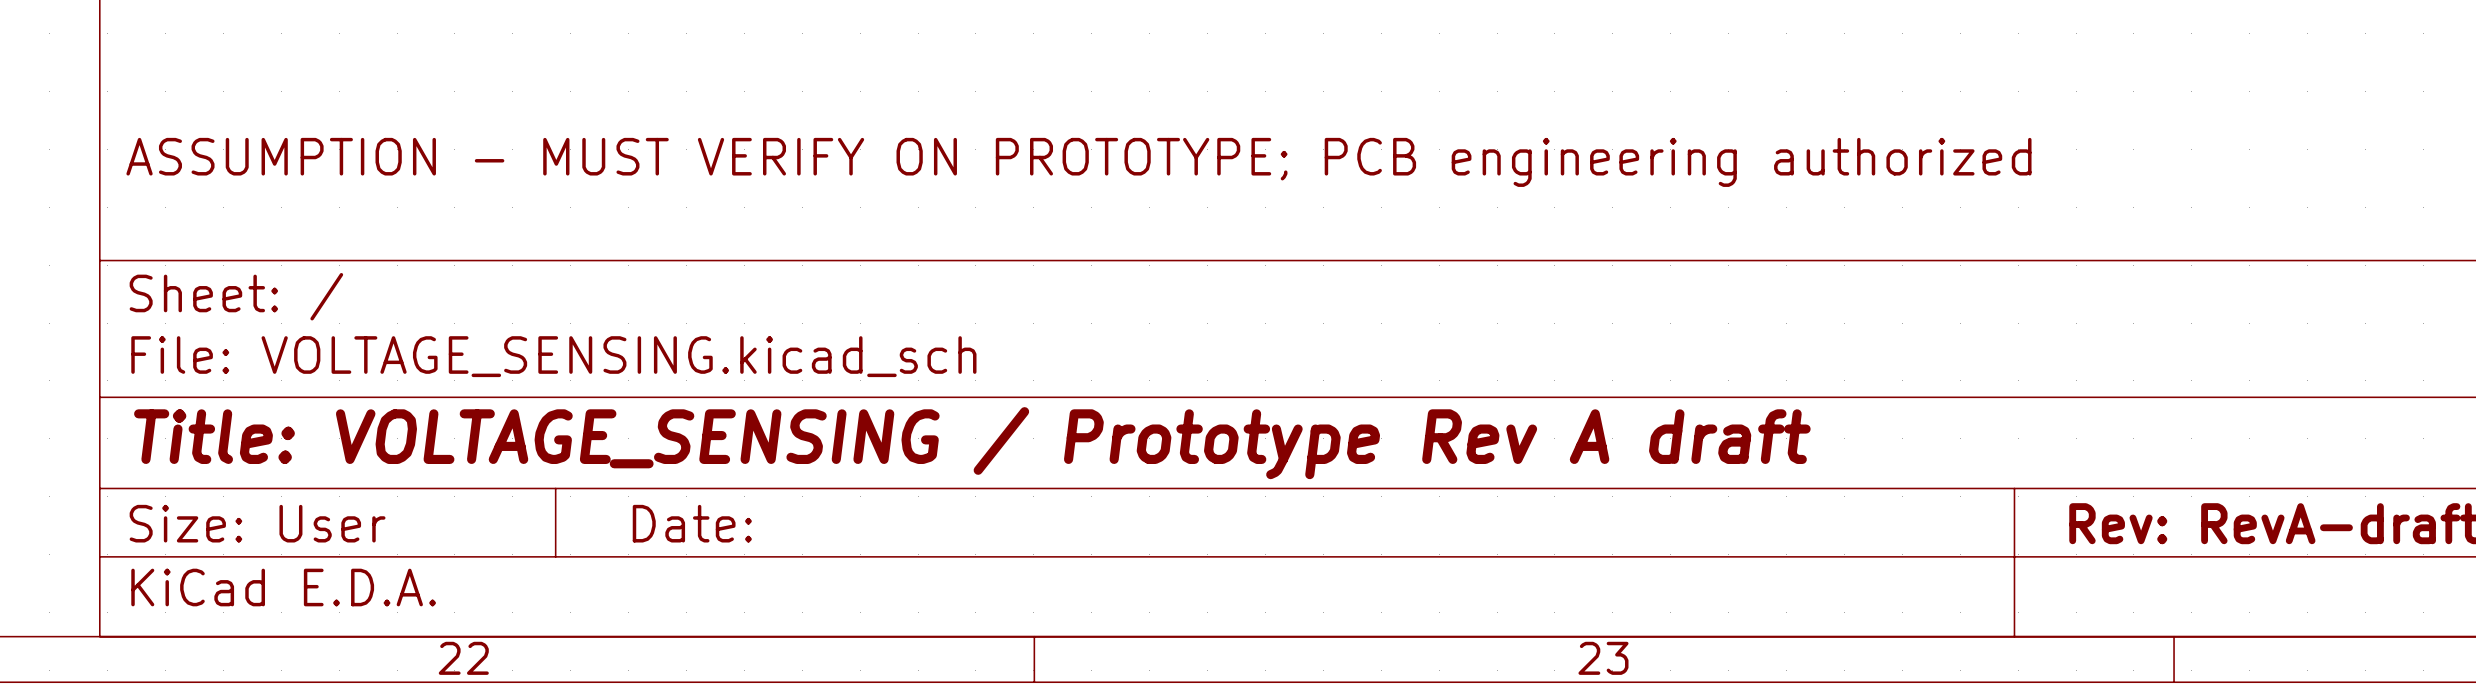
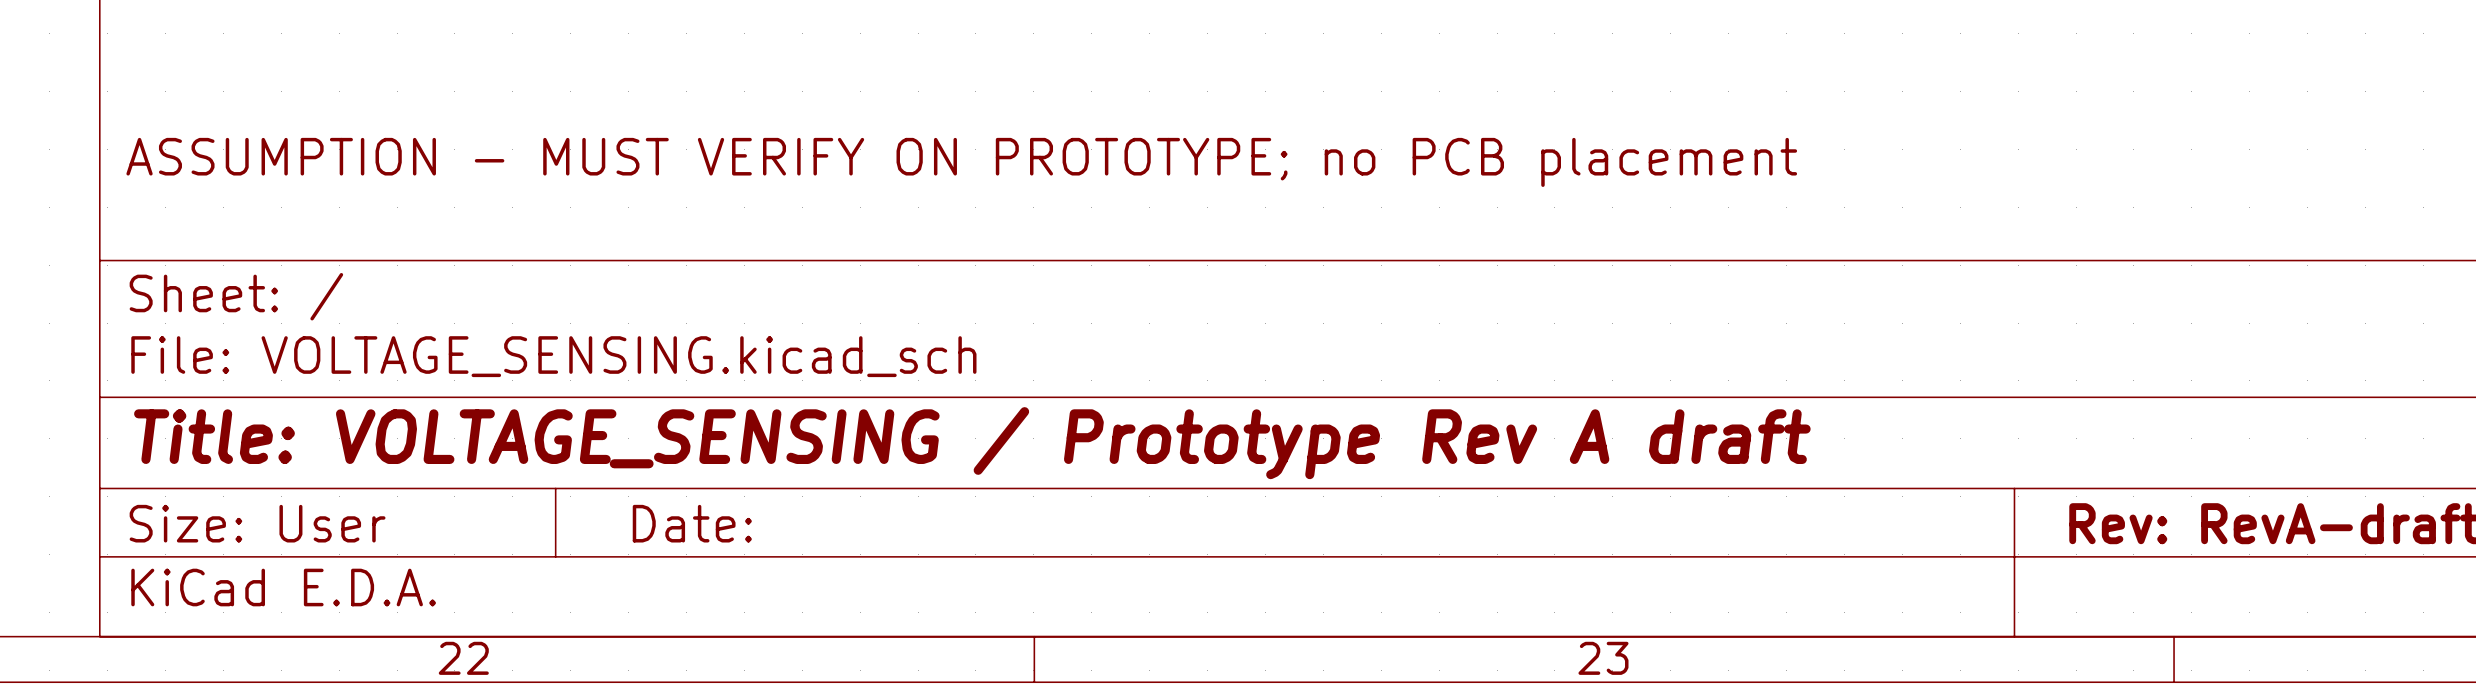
title block: ASSUMPTION - MUST VERIFY ON PROTOTYPE; PCB engineering authorized (1078, 162) -> ASSUMPTION - MUST VERIFY ON PROTOTYPE; no PCB placement (961, 162)

